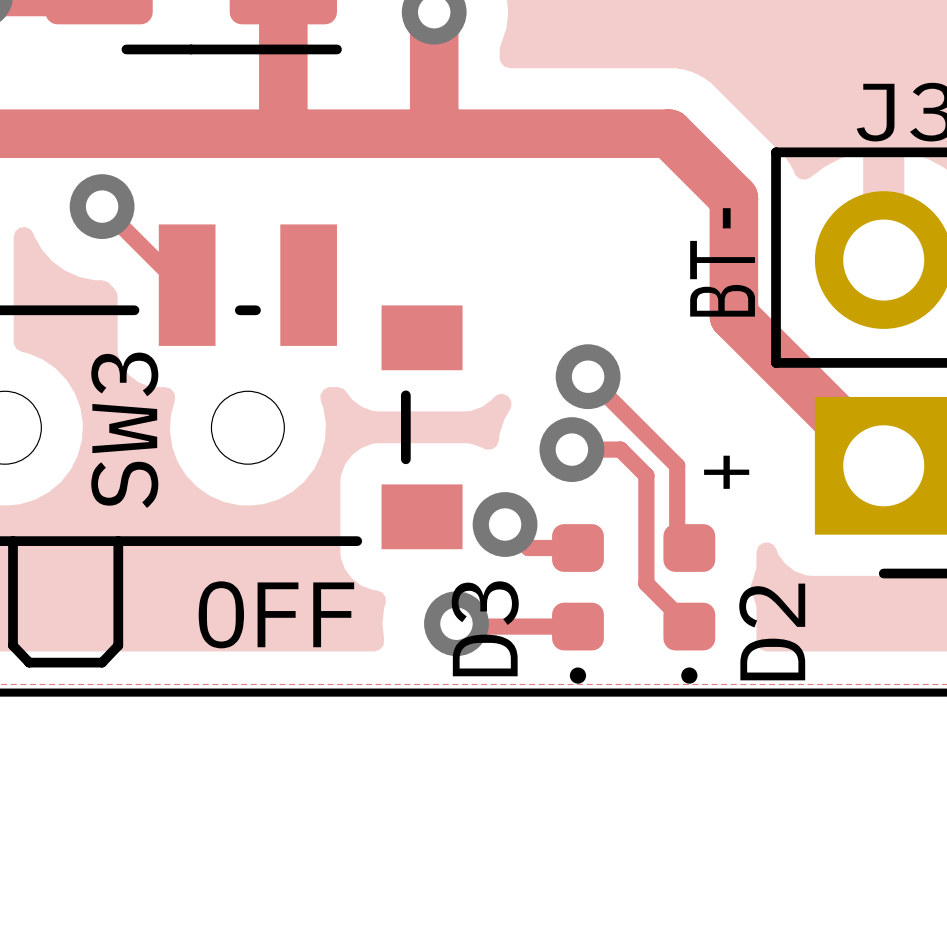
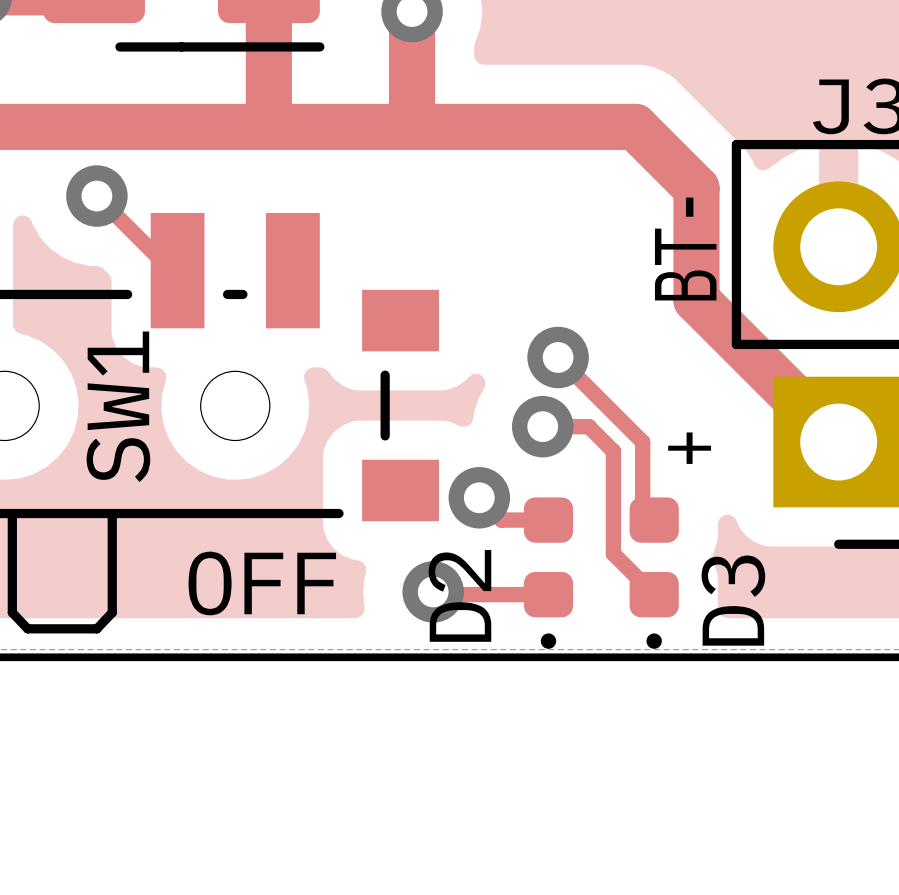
SW3 name: SW3 (124, 430) -> SW1 (118, 406)
D3 name: D3 (485, 628) -> D2 (459, 595)
D2 name: D2 (772, 631) -> D3 (733, 600)

